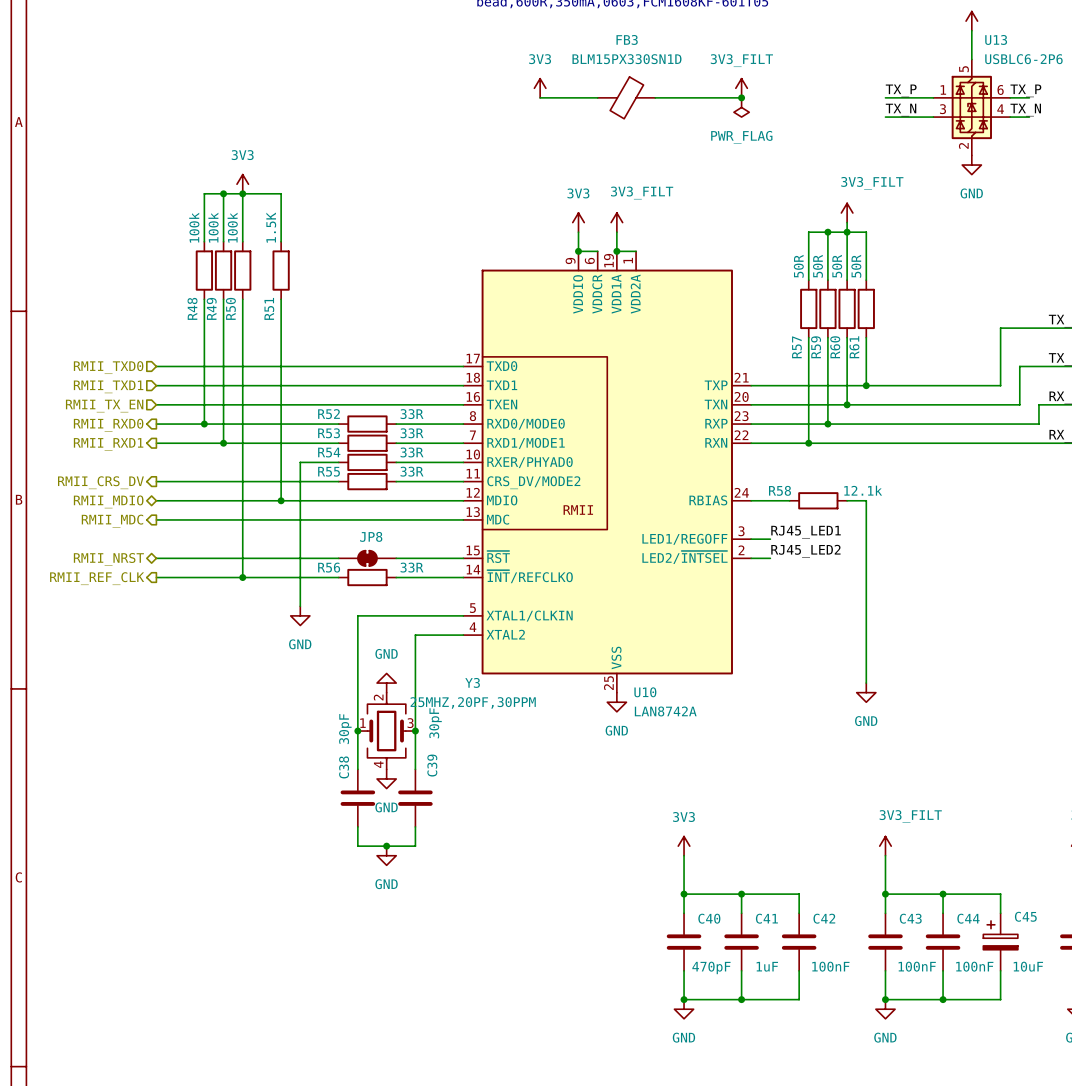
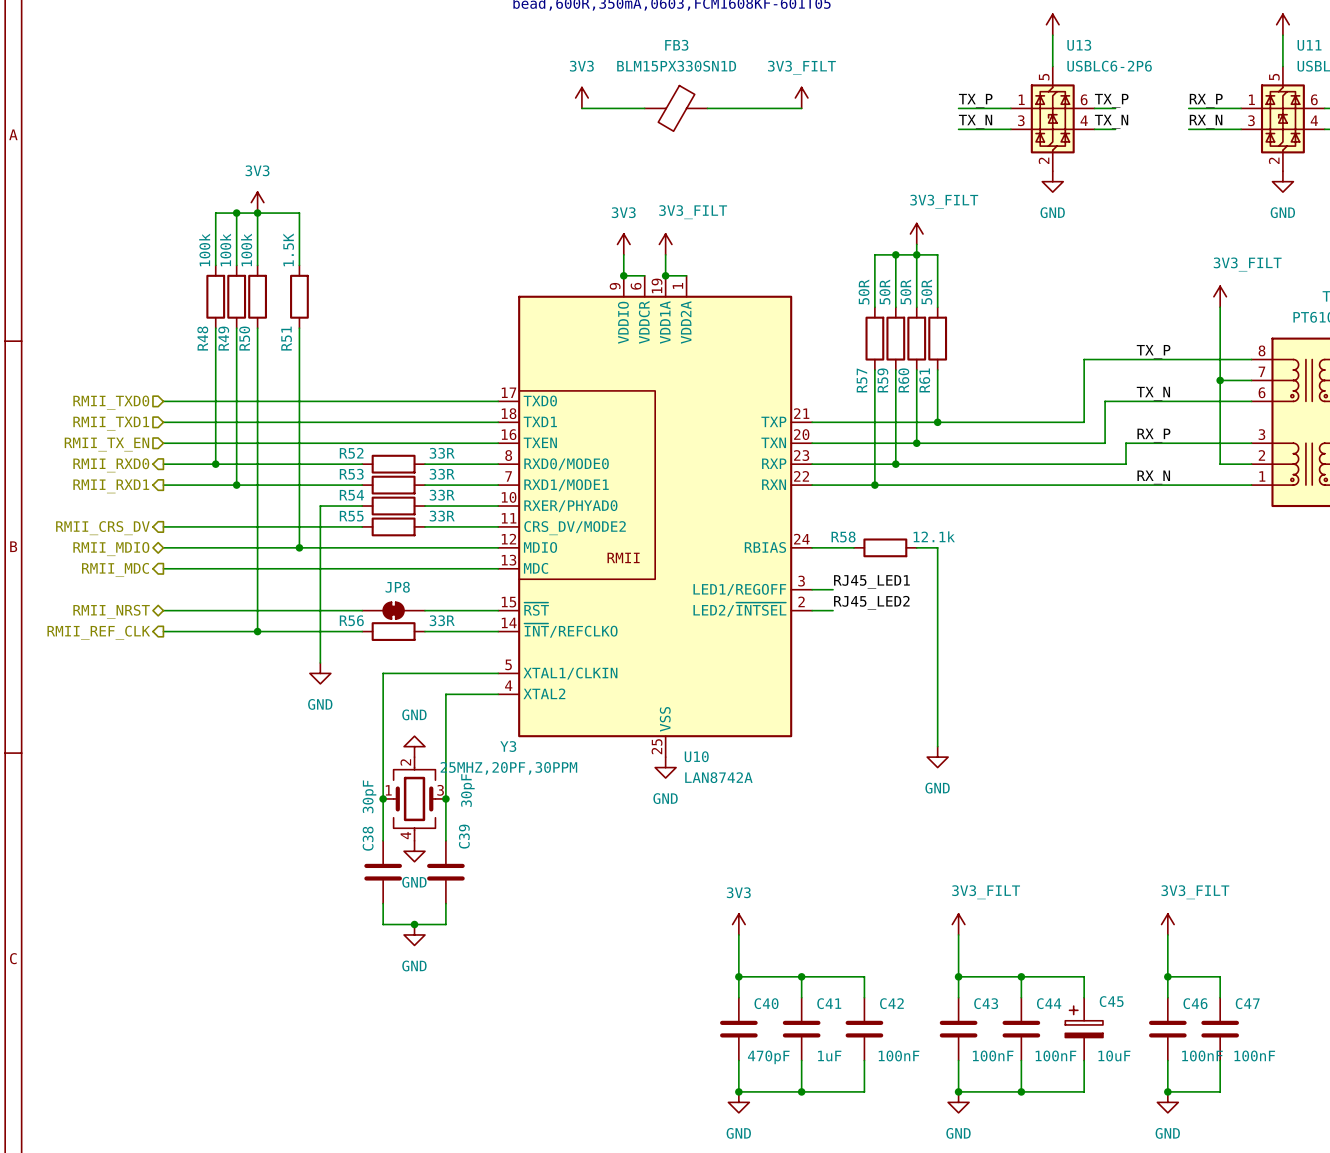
junction: (741, 97) -> none
power symbol: PWR_FLAG (741, 107) -> none

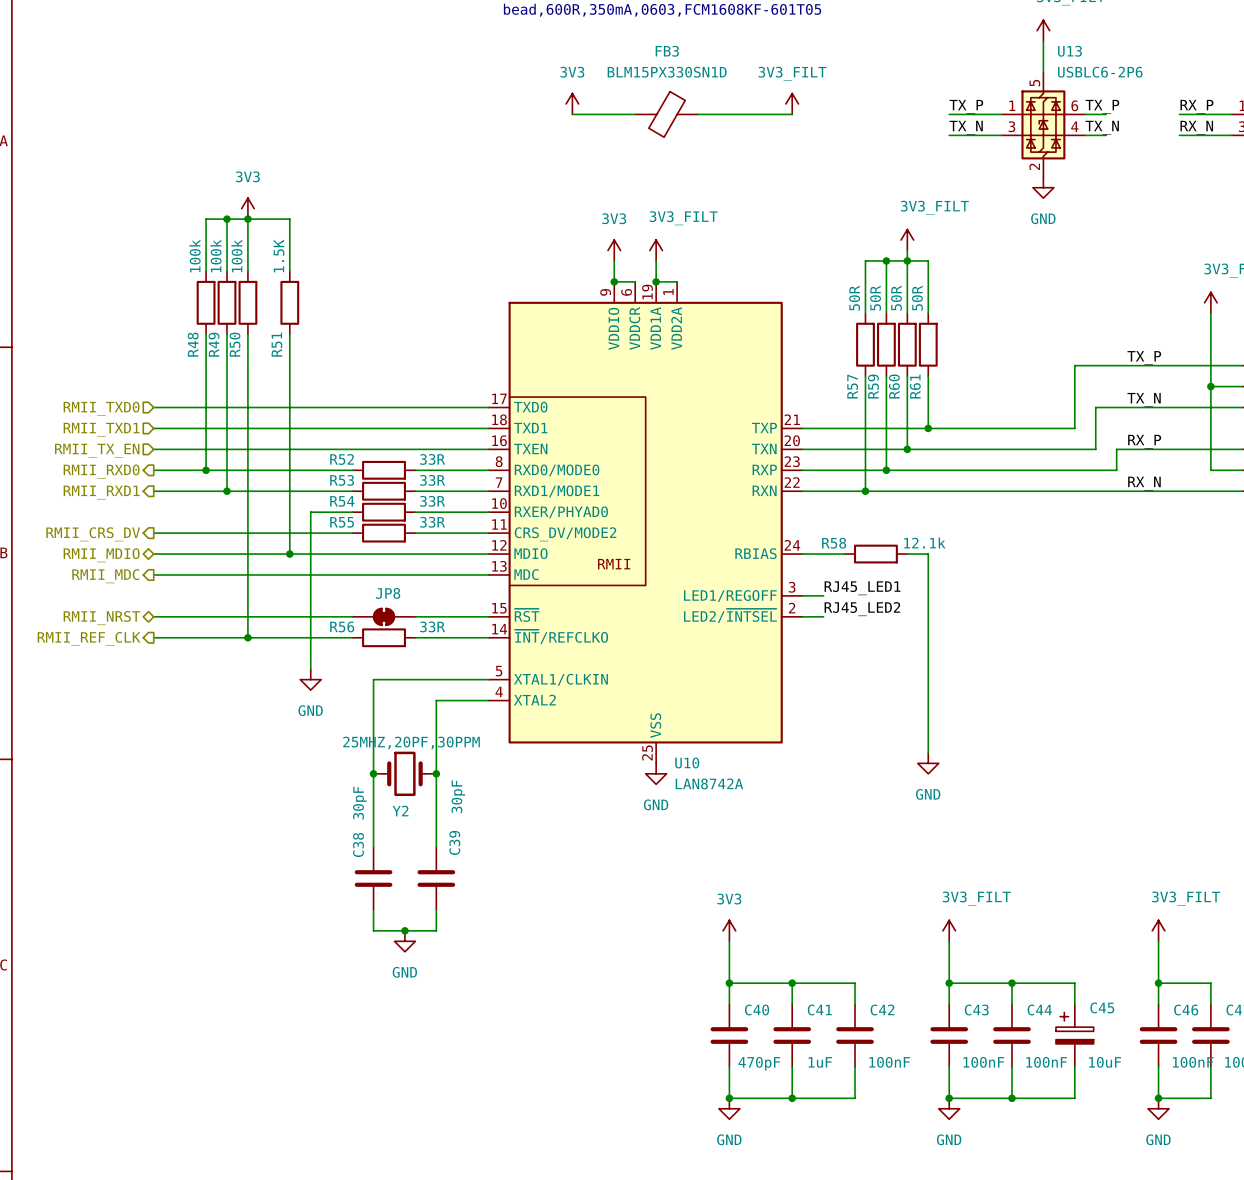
power symbol: GND (414, 746) -> none
Y2: none -> 25MHZ,20PF,30PPM (404, 773)
junction position: (383, 798) -> (373, 773)
Y3: 25MHZ,20PF,30PPM (414, 798) -> none
junction position: (445, 798) -> (436, 773)
power symbol: GND (414, 851) -> none

